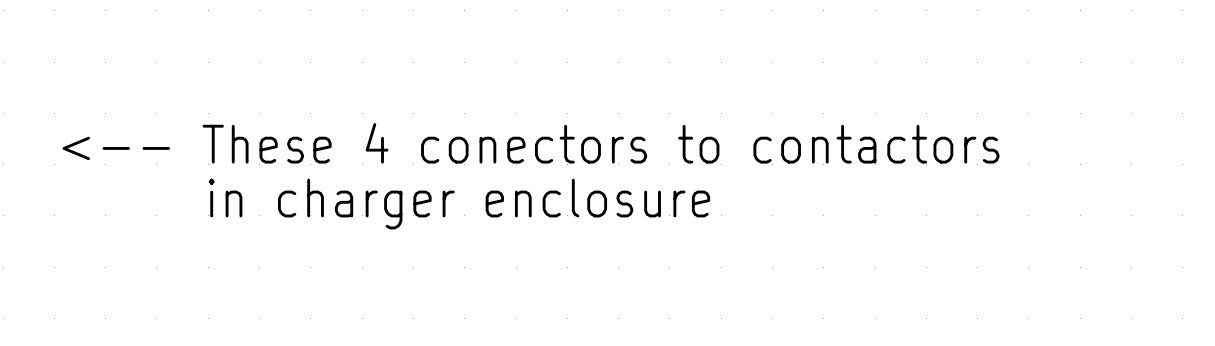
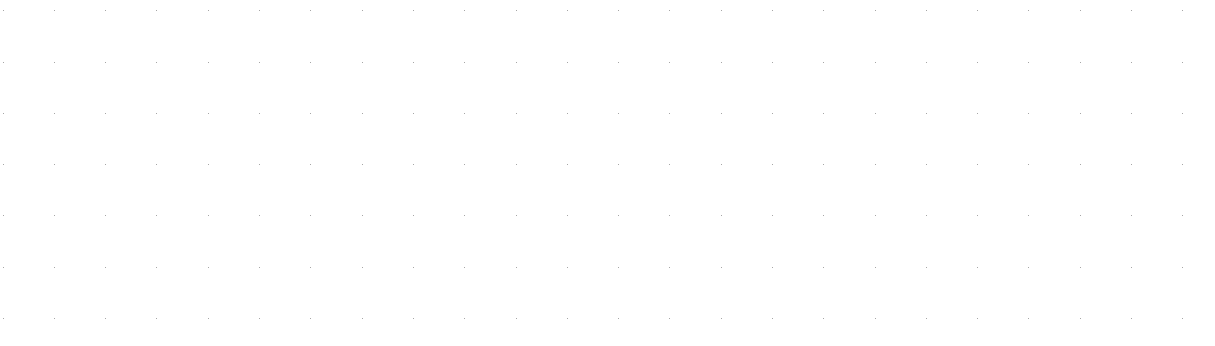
text: <-- These 4 conectors to contactors (531, 143) -> none
text: in charger enclosure (459, 204) -> none

